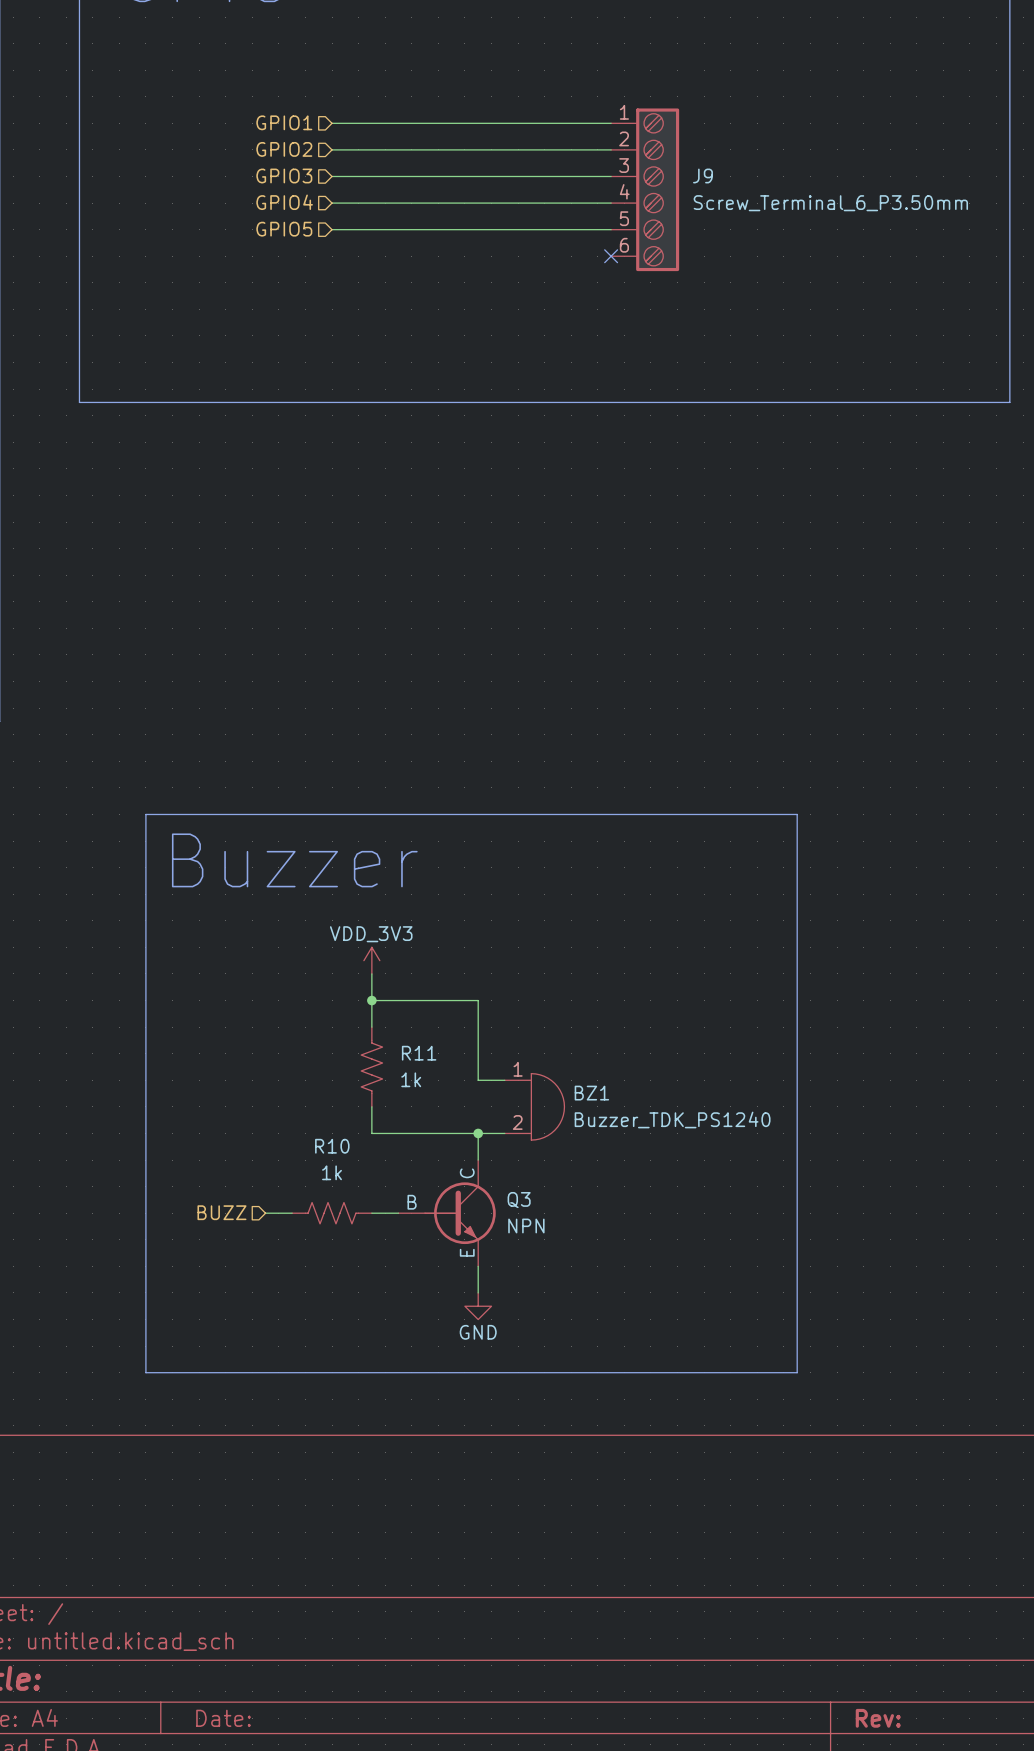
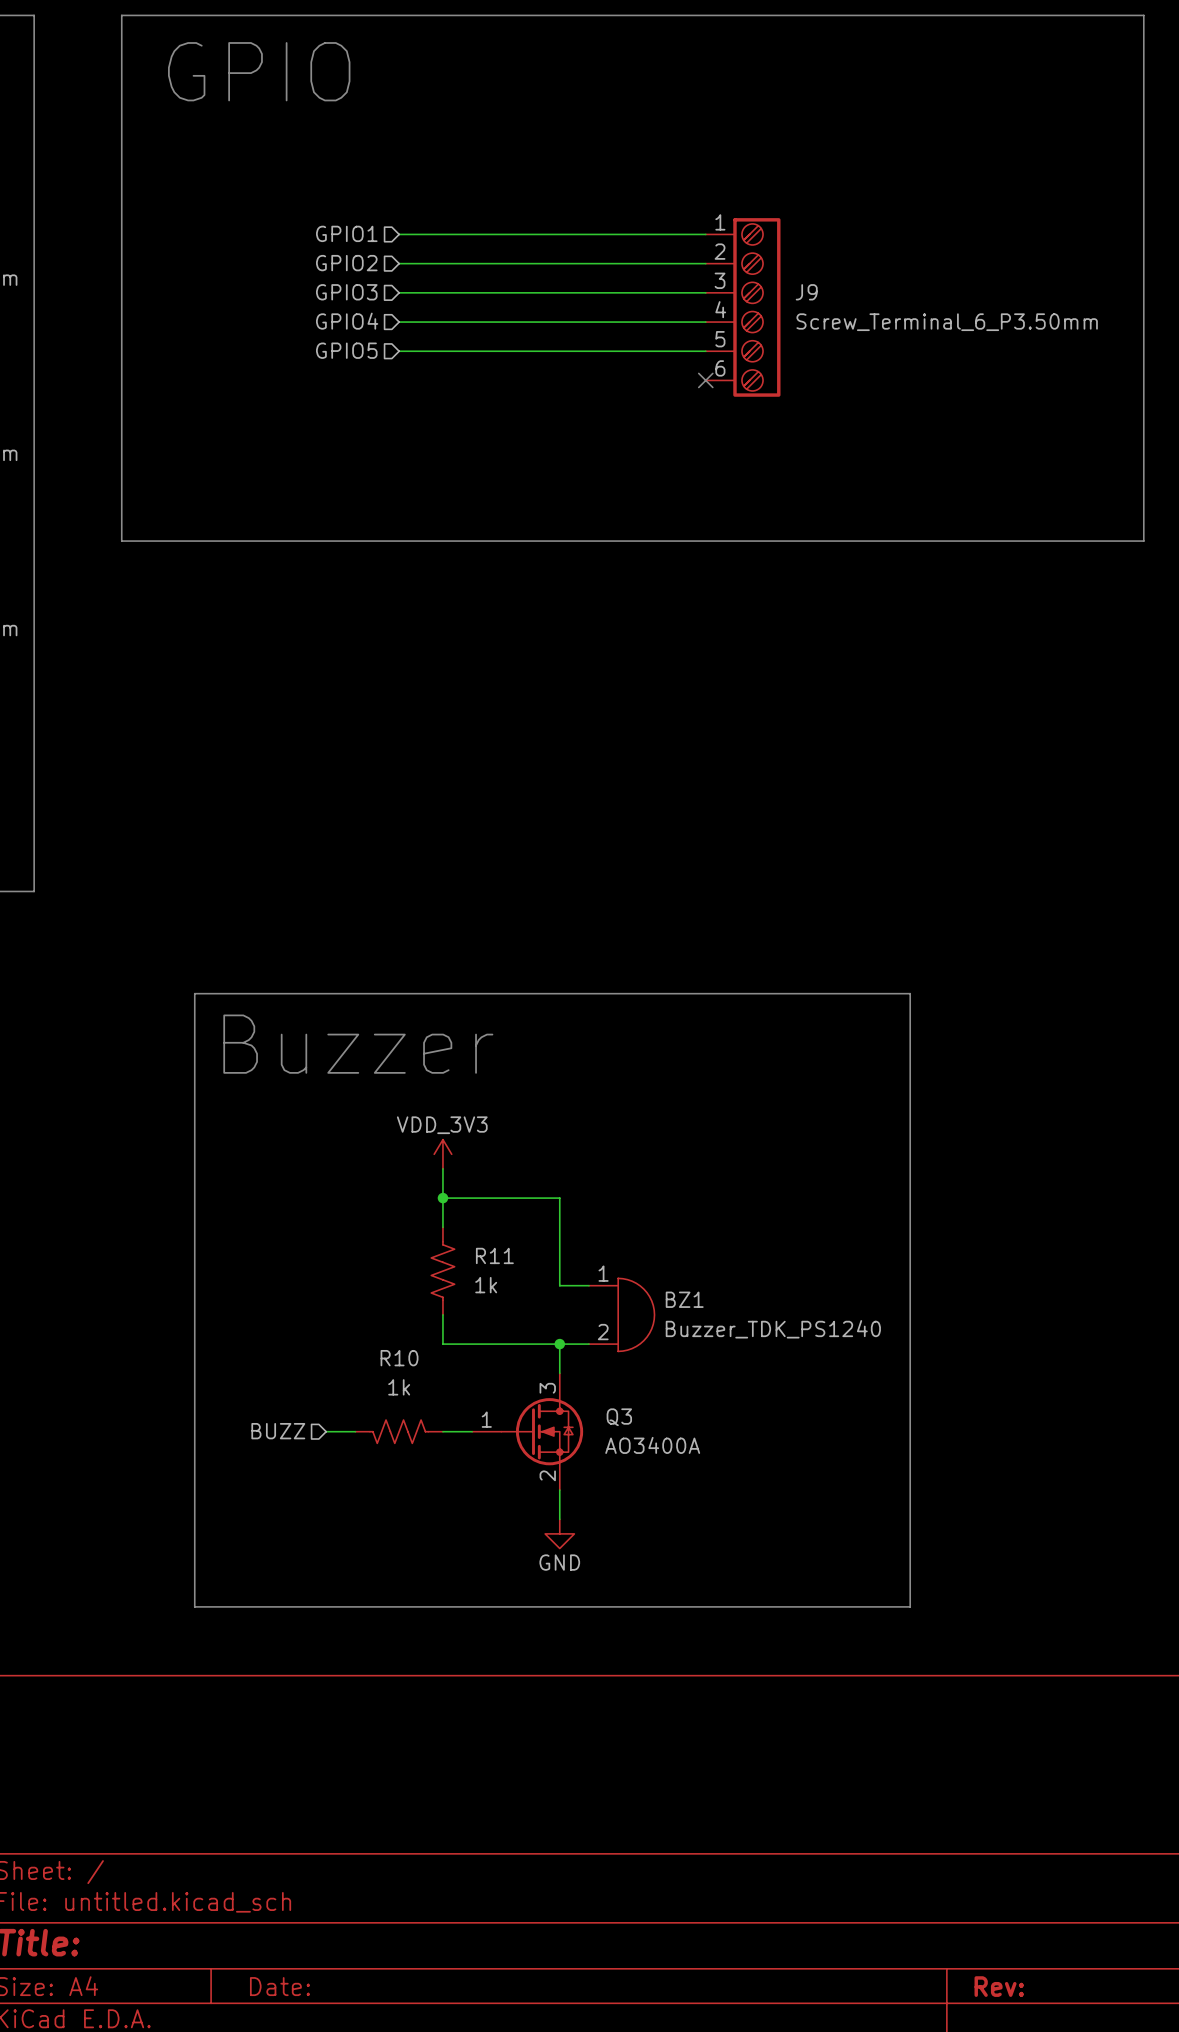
Q3 symbol: [398, 1160, 496, 1267] -> [472, 1373, 584, 1491]
R10 flip: as is (332, 1213) -> left-right (399, 1431)
Q3 value: NPN (526, 1226) -> AO3400A (652, 1445)

